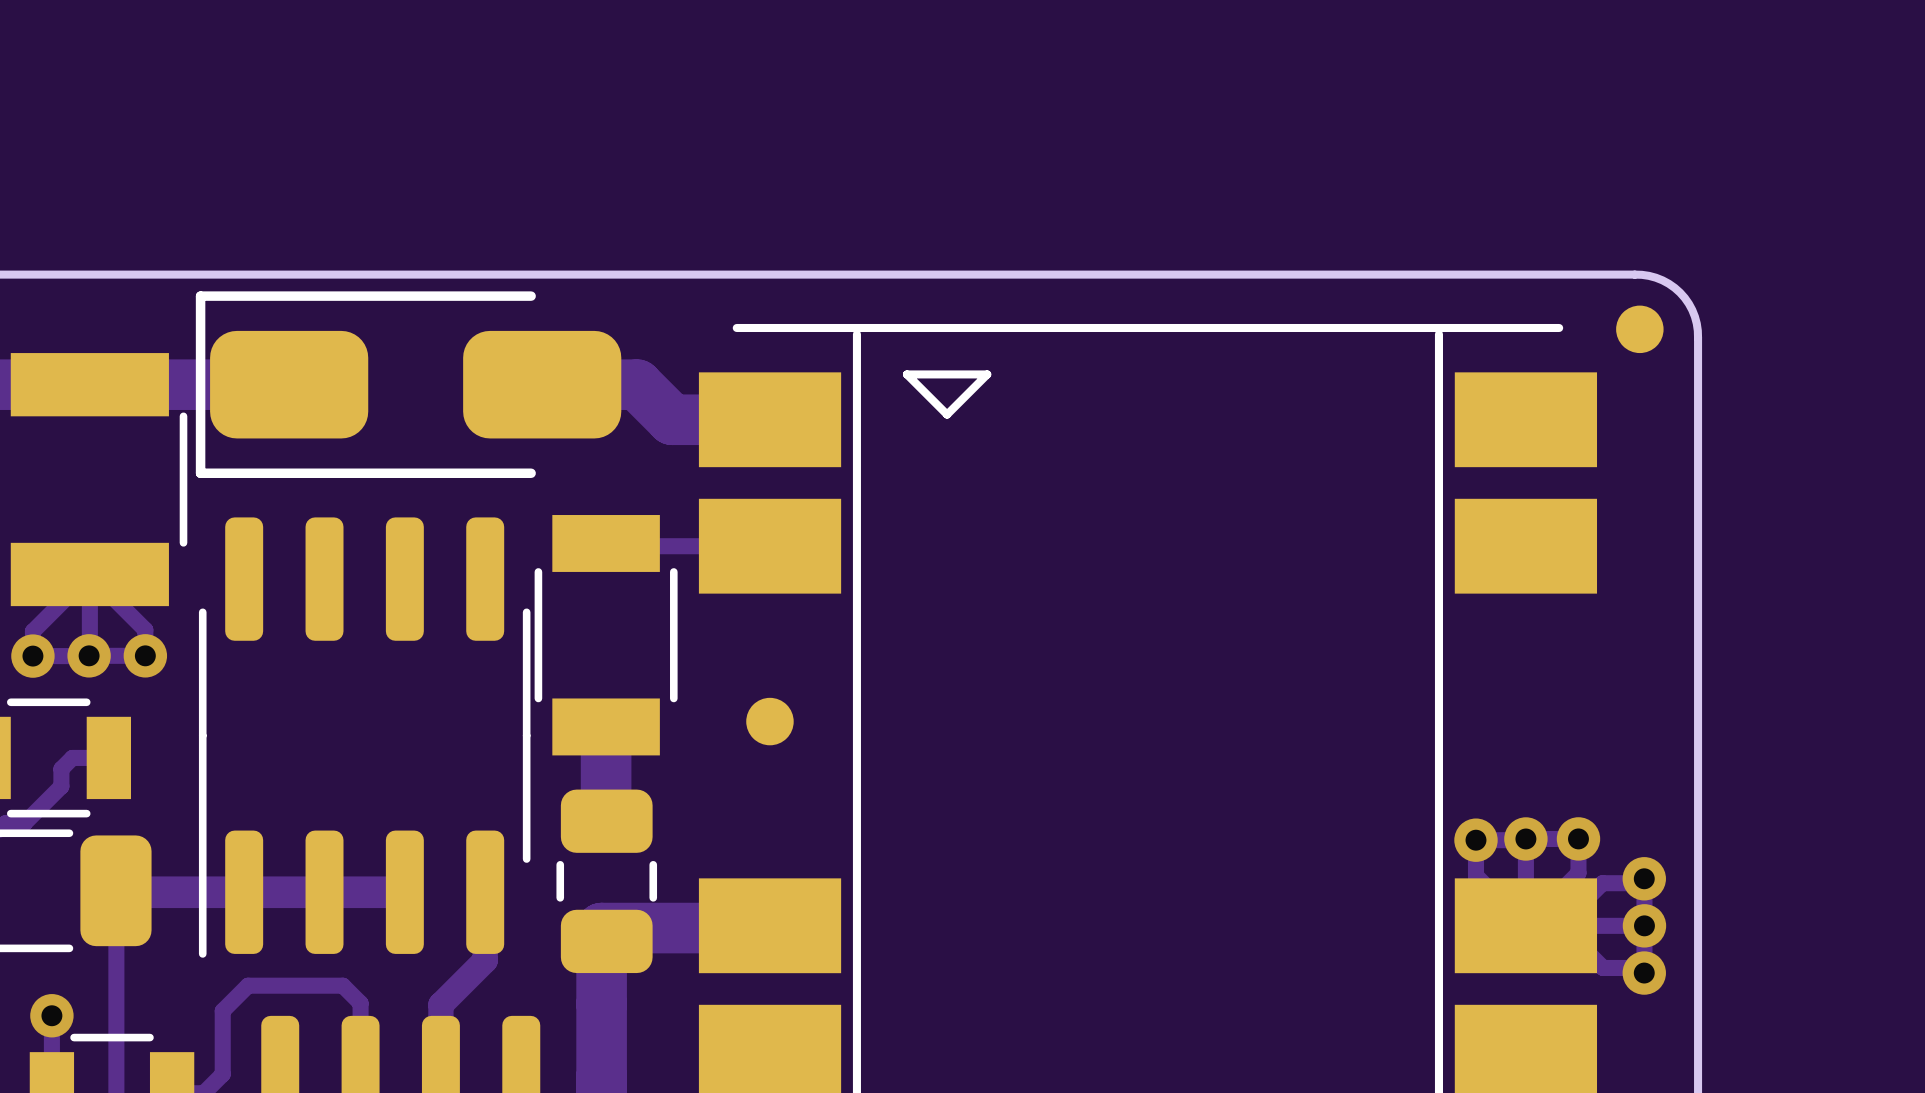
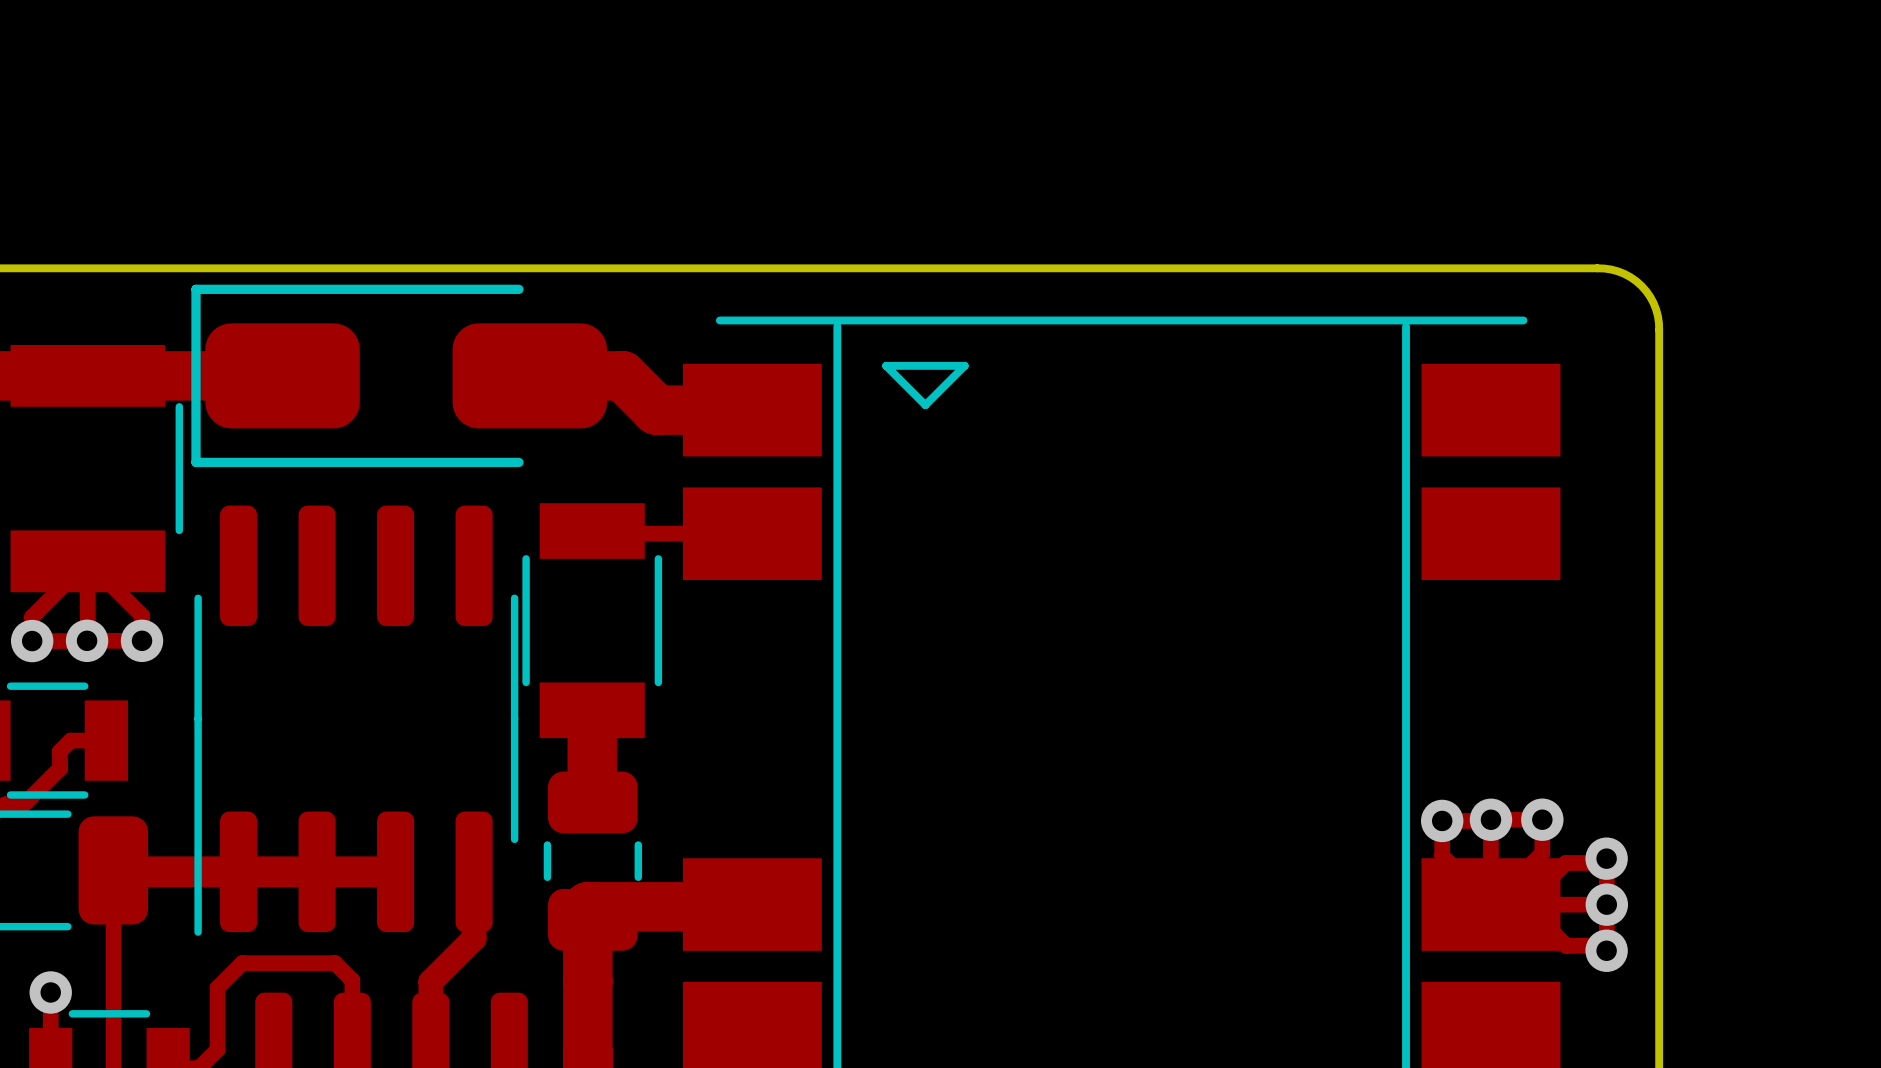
part: (1639, 329) -> none
part: (769, 721) -> none

